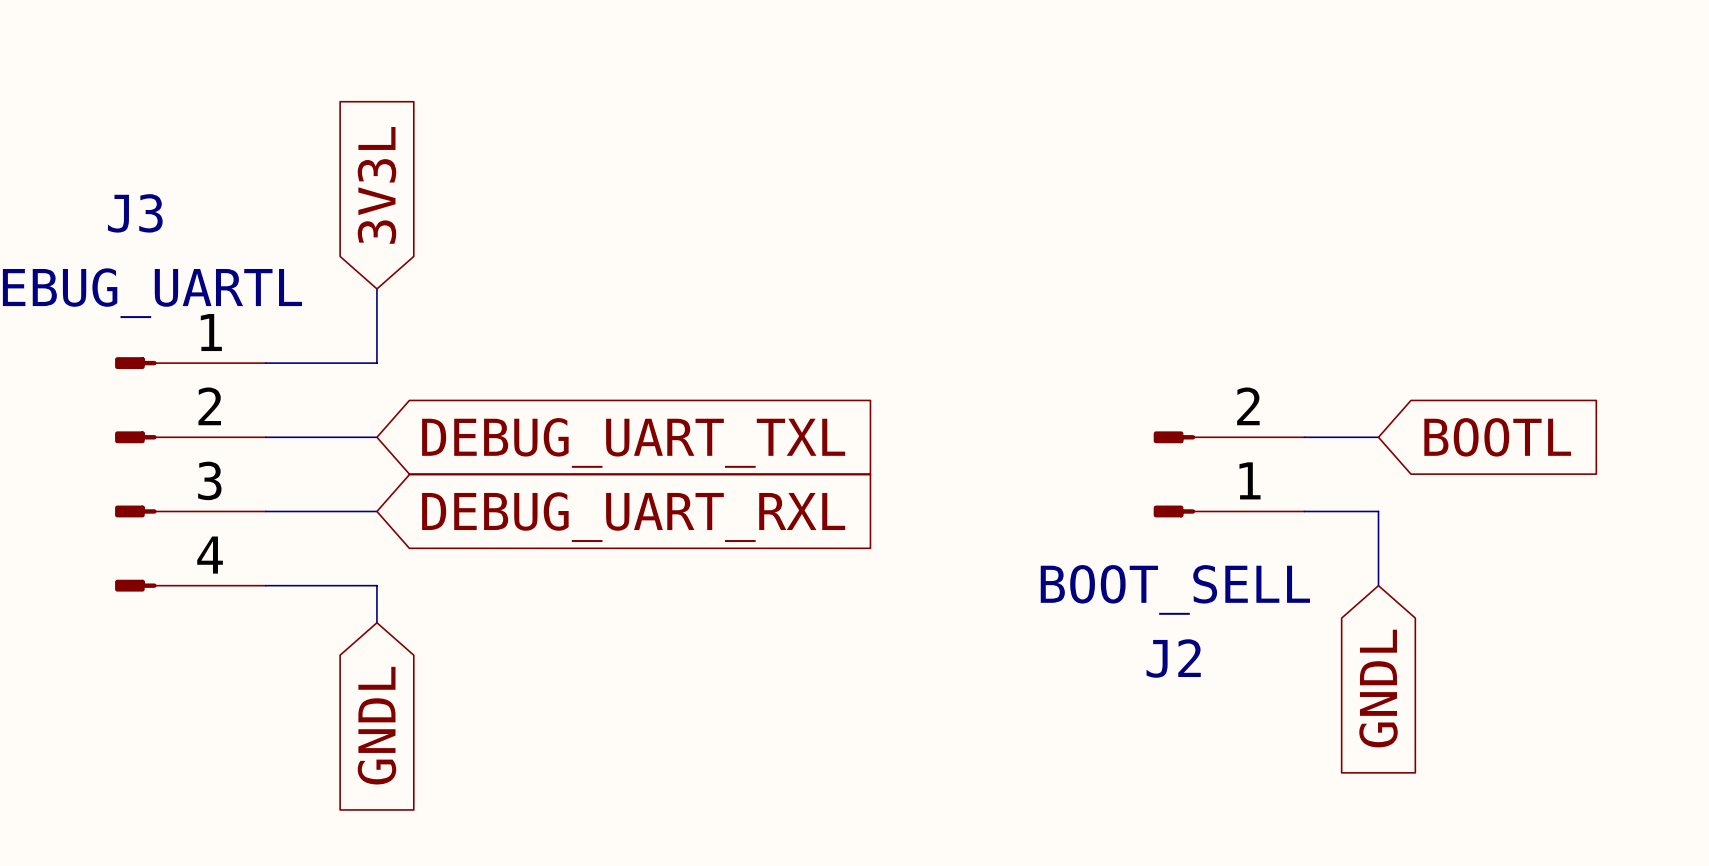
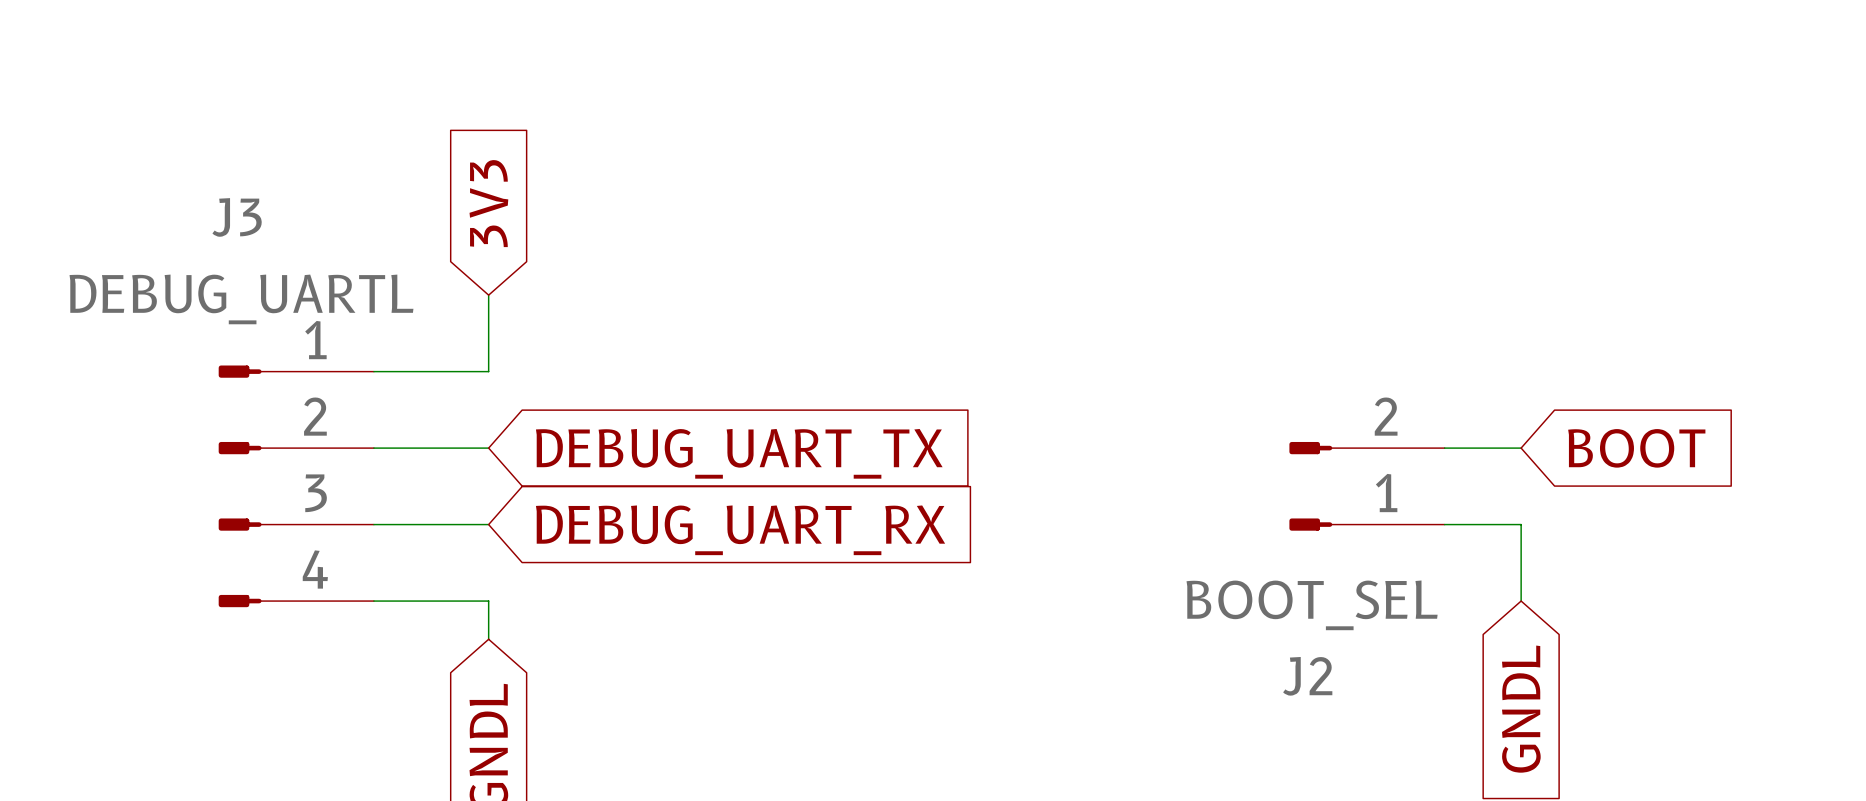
global label: 3V3L (376, 185) -> 3V3 (488, 203)
global label: BOOTL (1497, 437) -> BOOT (1636, 448)
global label: DEBUG_UART_TXL (633, 442) -> DEBUG_UART_TX (739, 453)
global label: DEBUG_UART_RXL (633, 517) -> DEBUG_UART_RX (740, 530)
J2 value: BOOT_SELL (1175, 589) -> BOOT_SEL (1312, 605)

